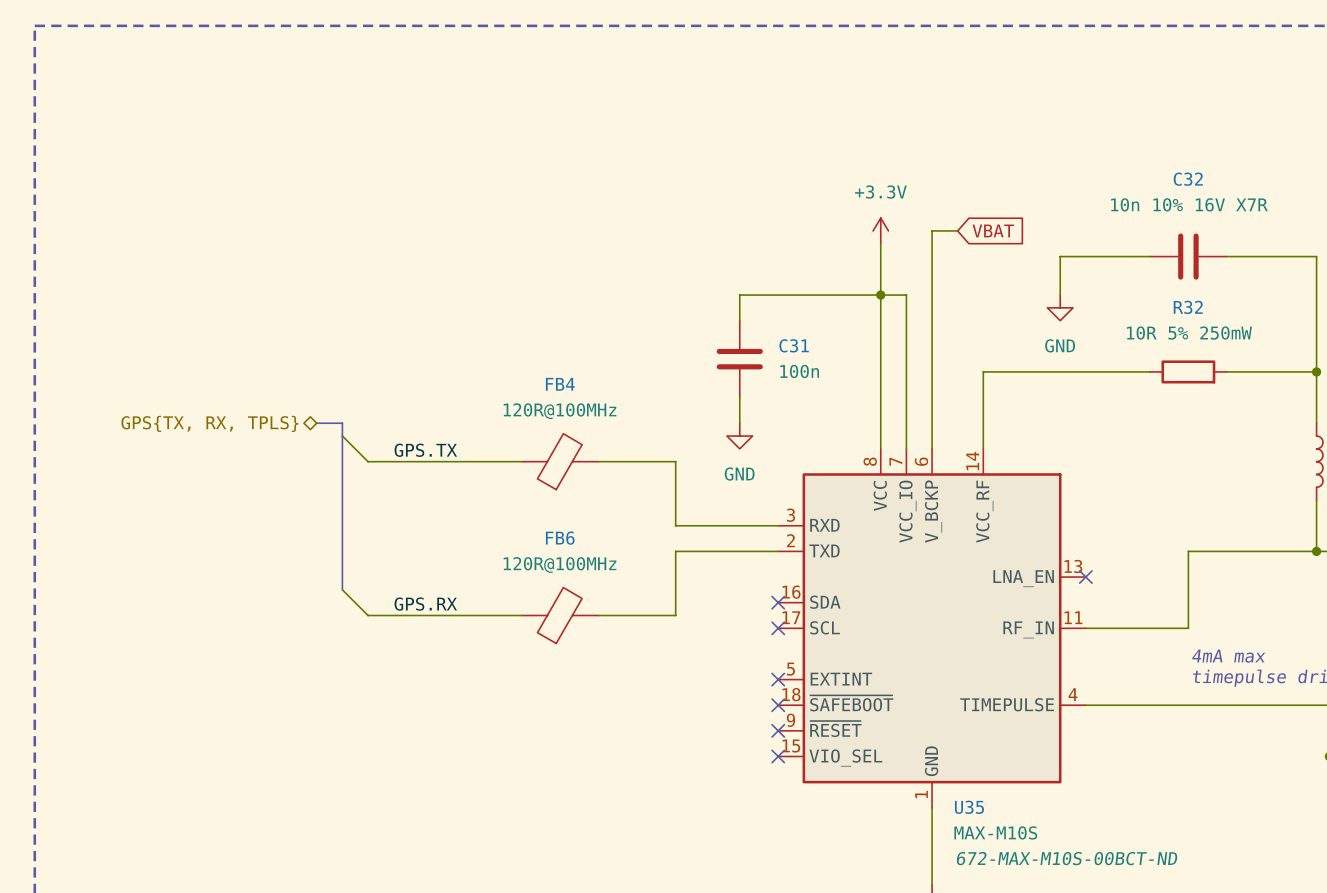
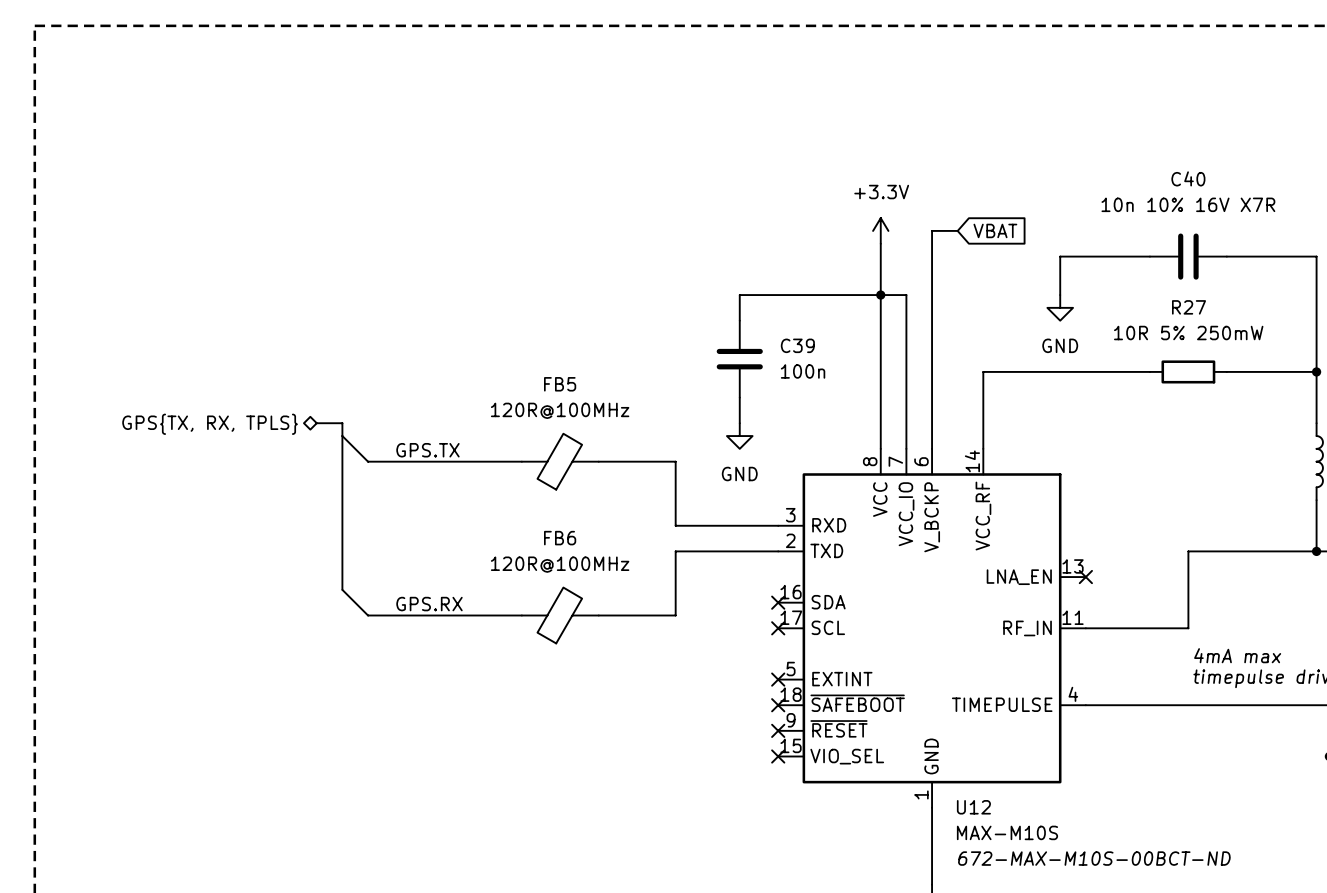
C32 name: C32 (1188, 179) -> C40 (1188, 178)
R32 name: R32 (1188, 307) -> R27 (1189, 307)
C31 name: C31 (794, 345) -> C39 (797, 345)
FB4 name: FB4 (560, 384) -> FB5 (560, 384)
U35 name: U35 (969, 807) -> U12 (973, 807)

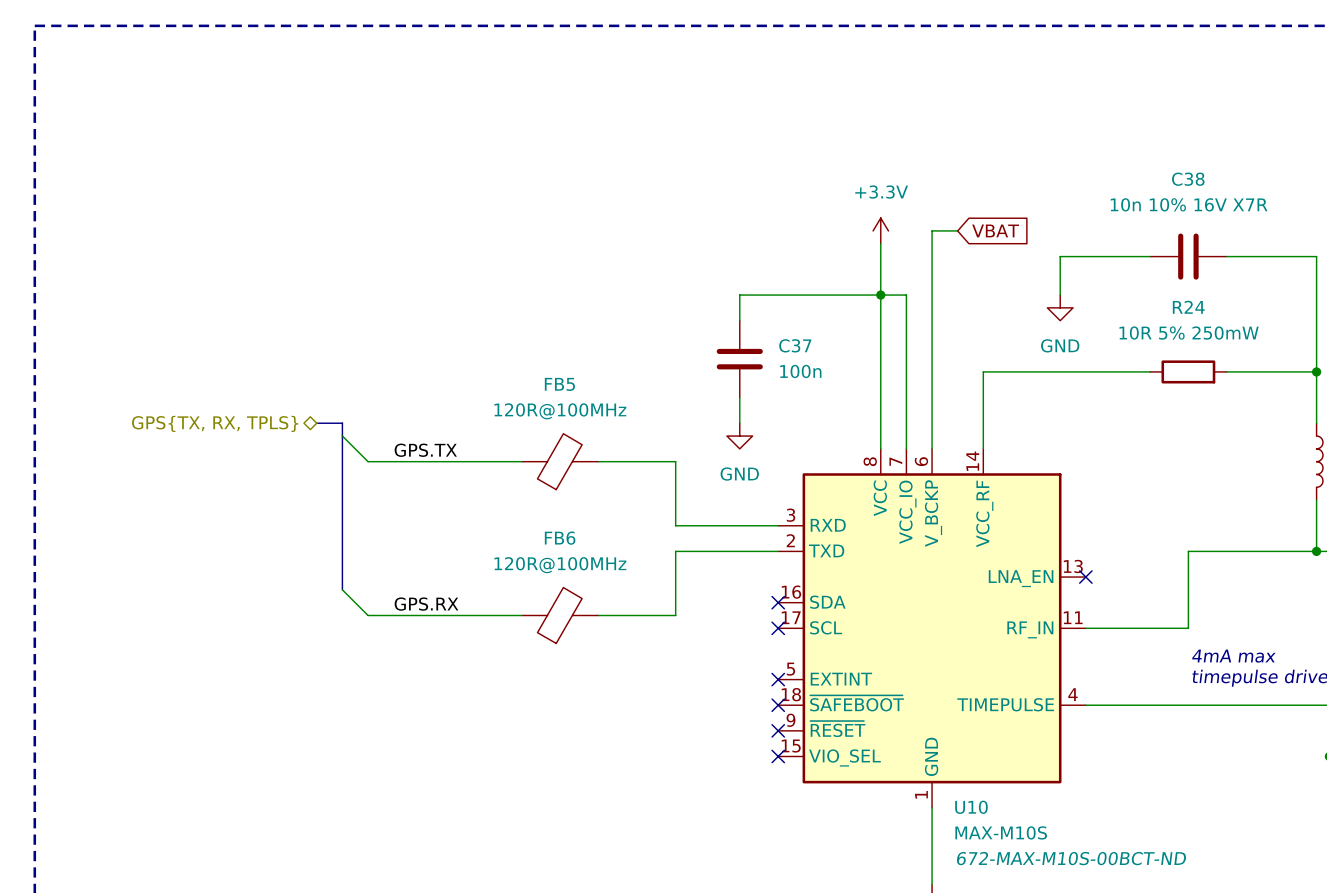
C40 name: C40 (1188, 178) -> C38 (1188, 179)
R27 name: R27 (1189, 307) -> R24 (1188, 307)
C39 name: C39 (797, 345) -> C37 (795, 345)
U12 name: U12 (973, 807) -> U10 (971, 807)

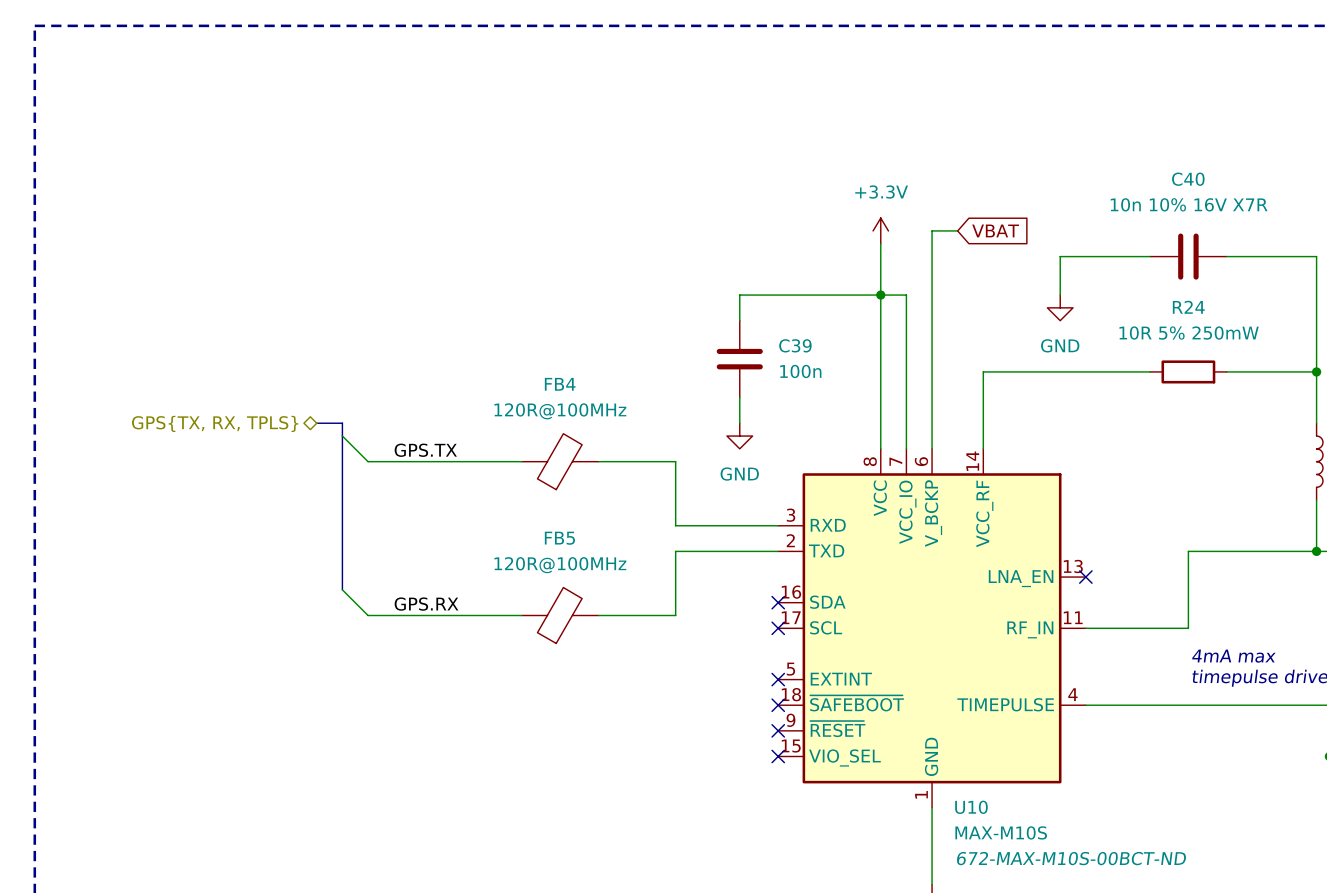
C38 name: C38 (1188, 179) -> C40 (1188, 179)
C37 name: C37 (795, 345) -> C39 (795, 345)
FB5 name: FB5 (559, 384) -> FB4 (560, 384)
FB6 name: FB6 (560, 538) -> FB5 (559, 538)

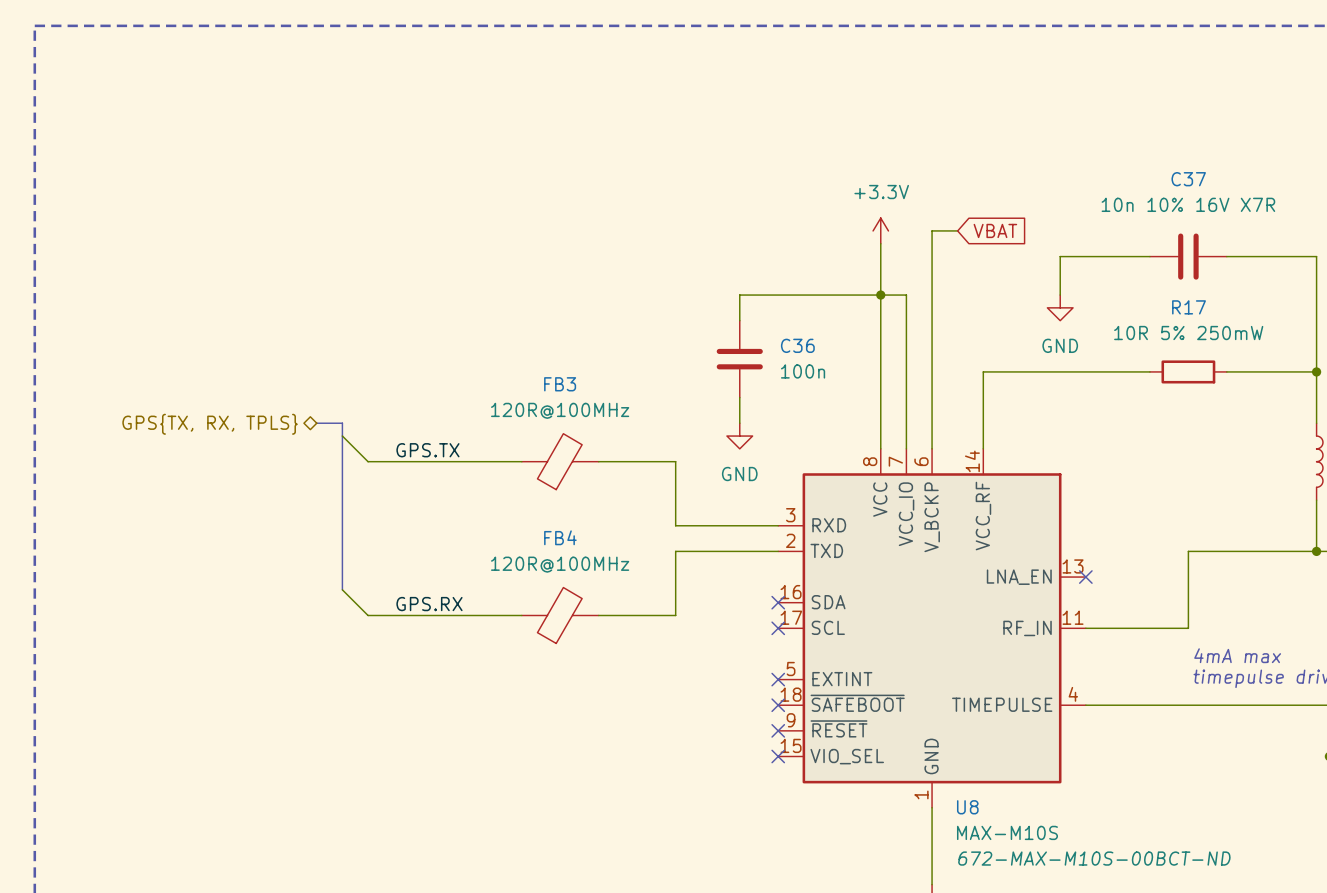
C40 name: C40 (1188, 179) -> C37 (1188, 179)
R24 name: R24 (1188, 307) -> R17 (1189, 307)
C39 name: C39 (795, 345) -> C36 (797, 345)
FB4 name: FB4 (560, 384) -> FB3 (560, 384)
FB5 name: FB5 (559, 538) -> FB4 (560, 537)
U10 name: U10 (971, 807) -> U8 (967, 807)

